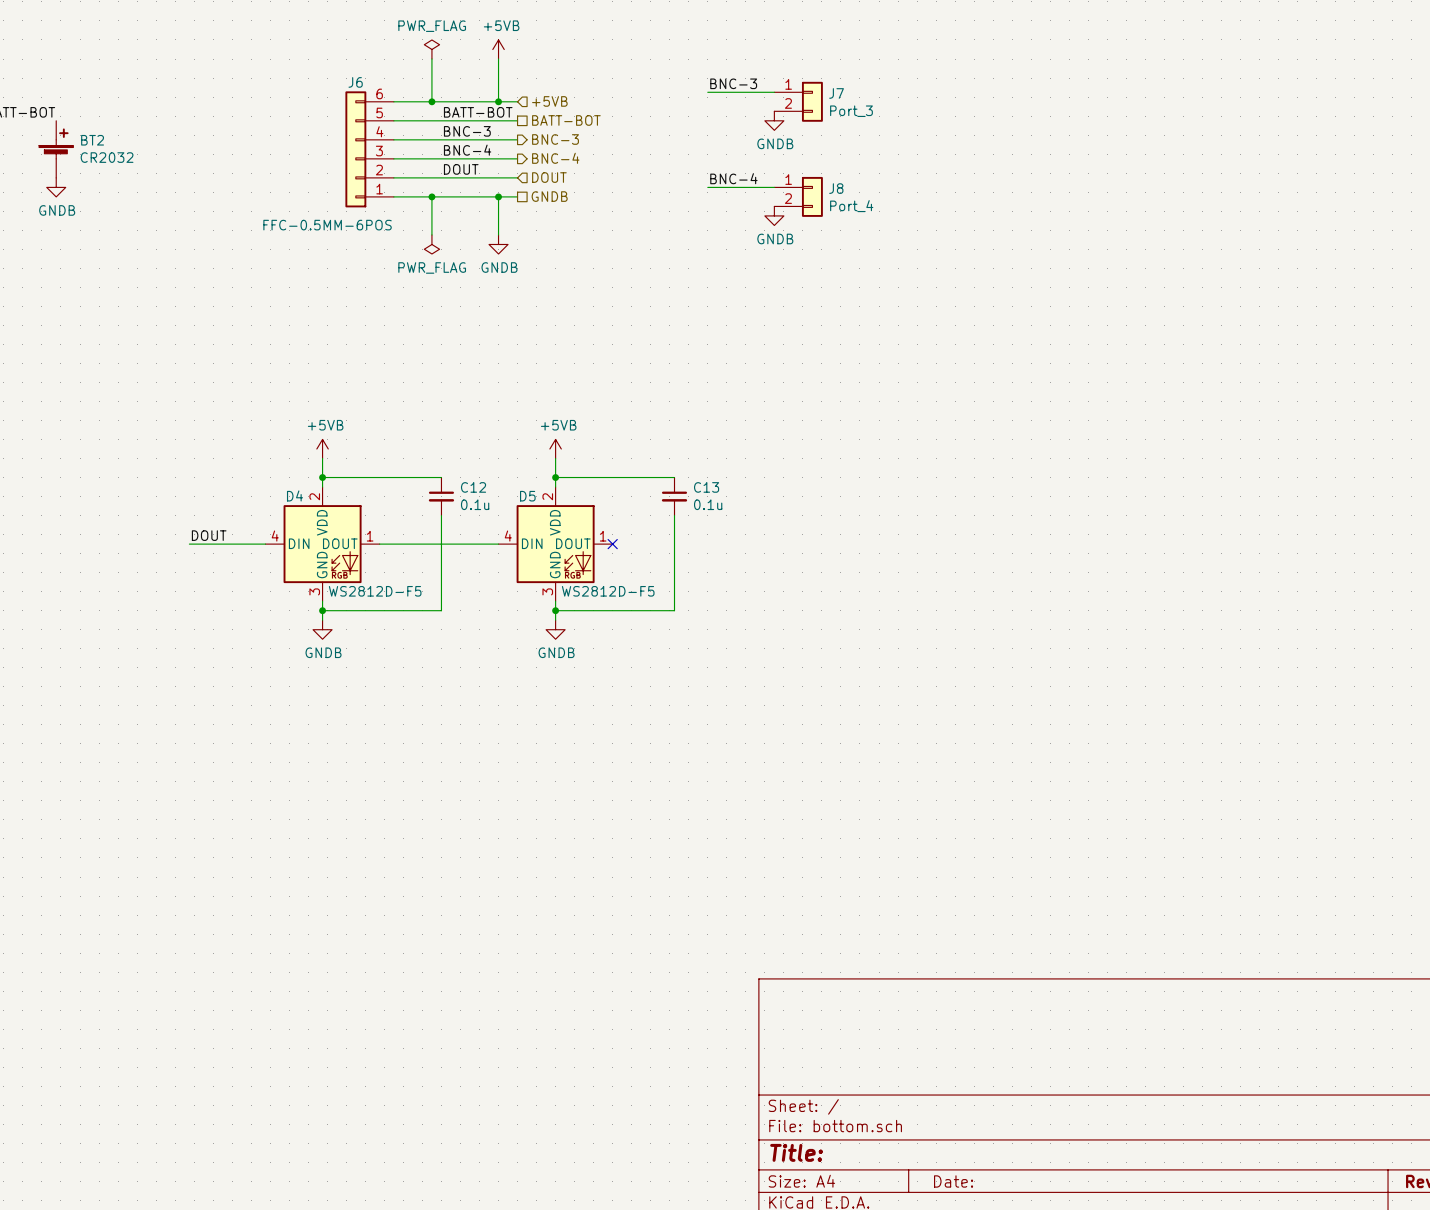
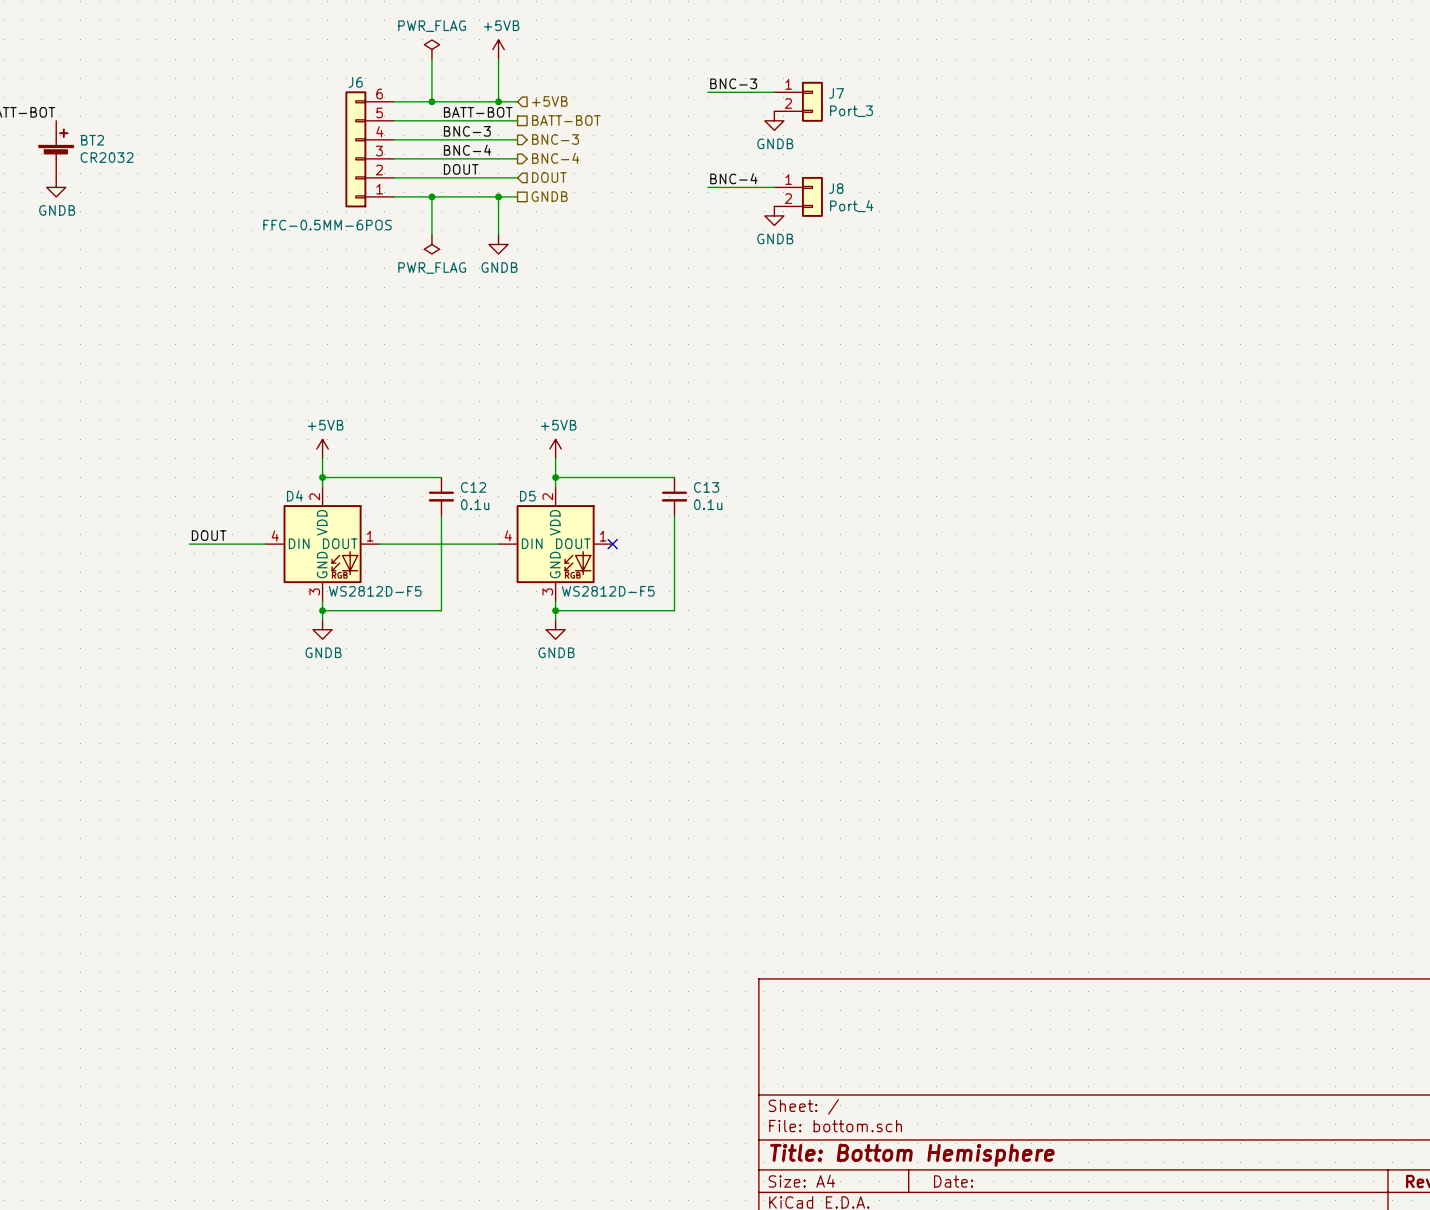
title block: Title: (796, 1152) -> Title: Bottom Hemisphere (912, 1155)

